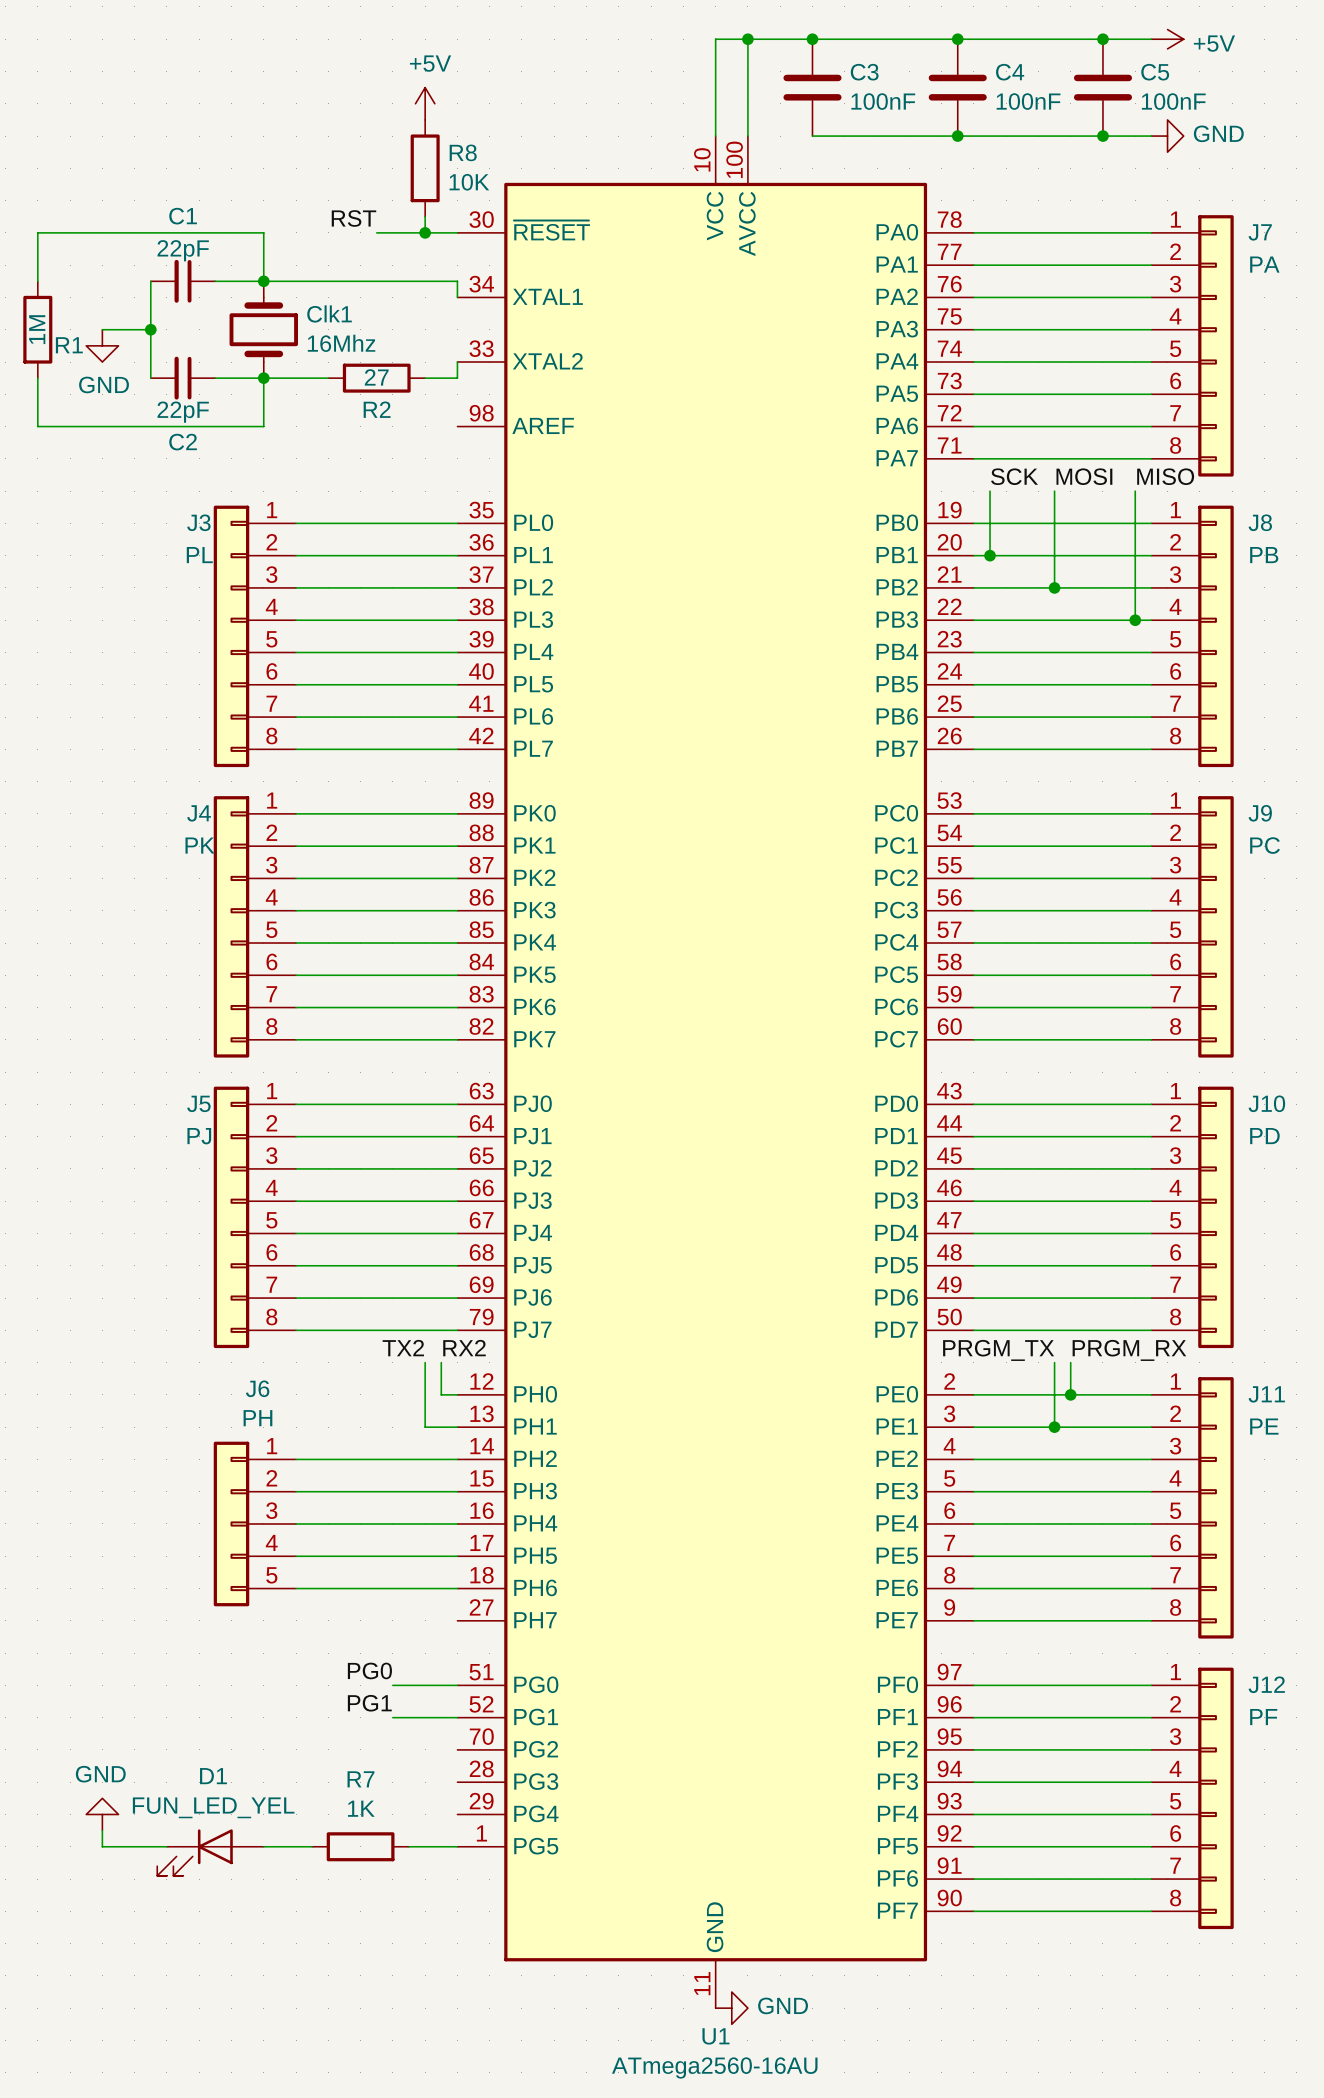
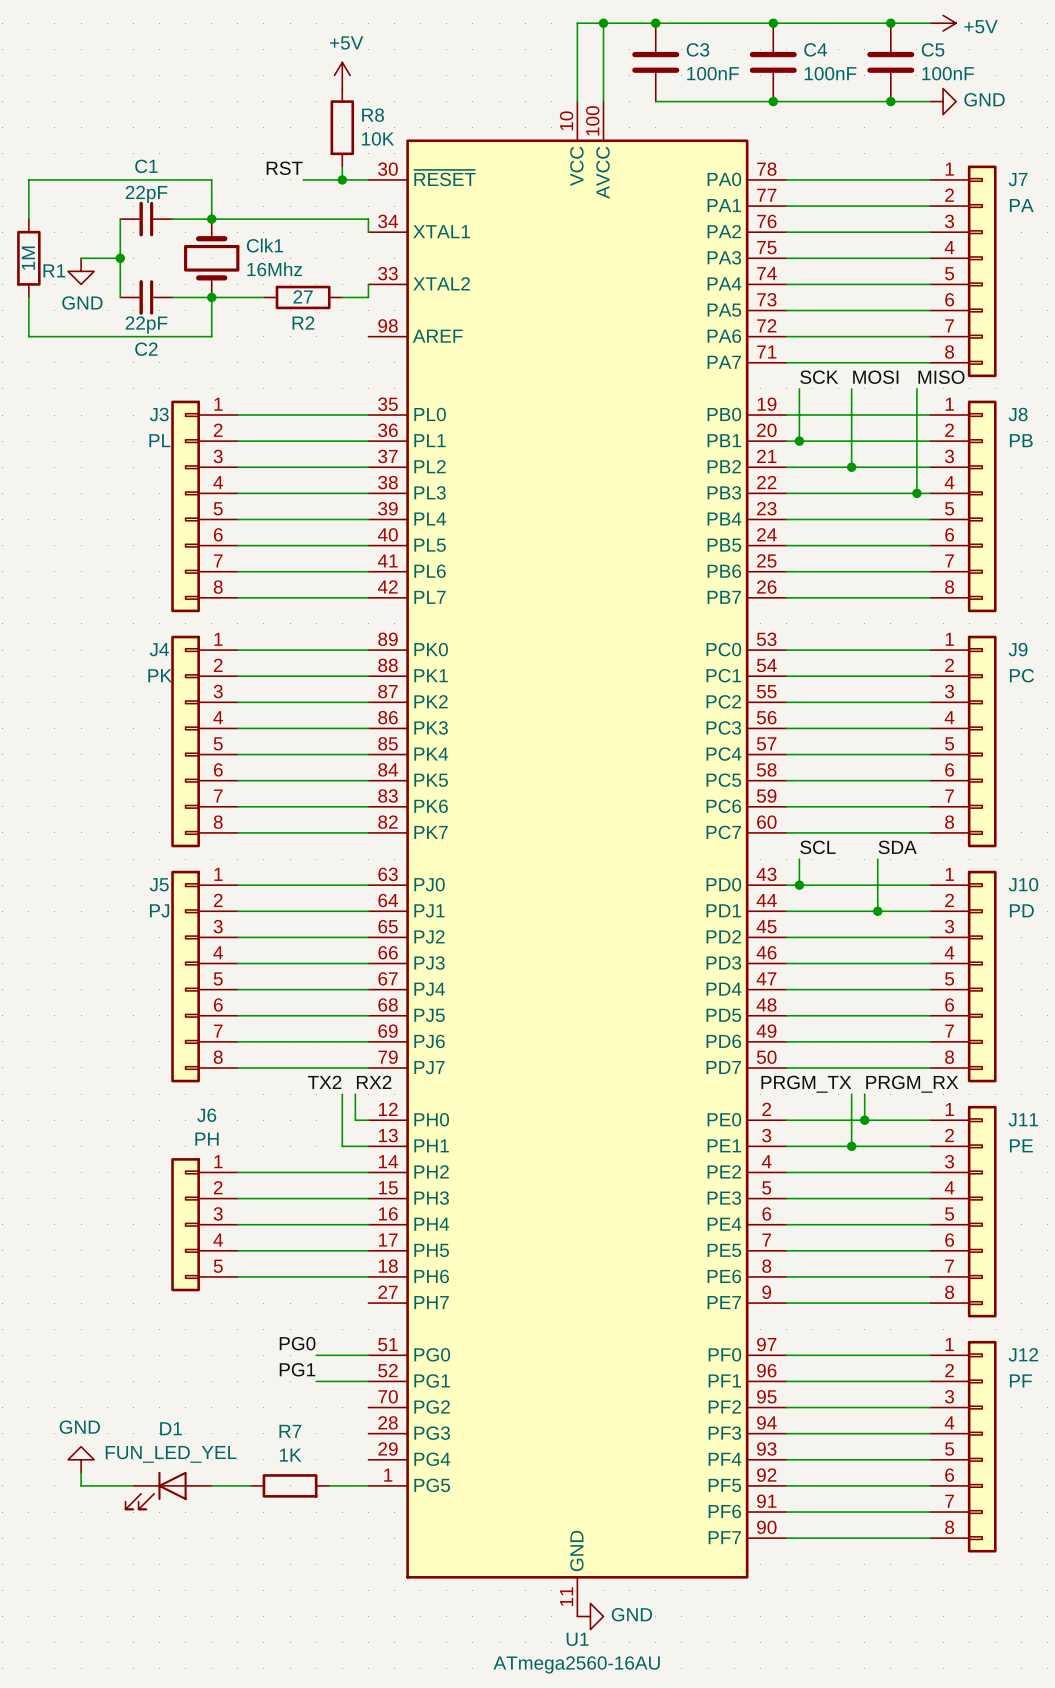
label: none -> SCL (817, 847)
label: none -> SDA (897, 847)
wire: none -> (799, 859) (799, 885)
wire: none -> (877, 859) (877, 911)
junction: none -> (799, 885)
junction: none -> (877, 911)

